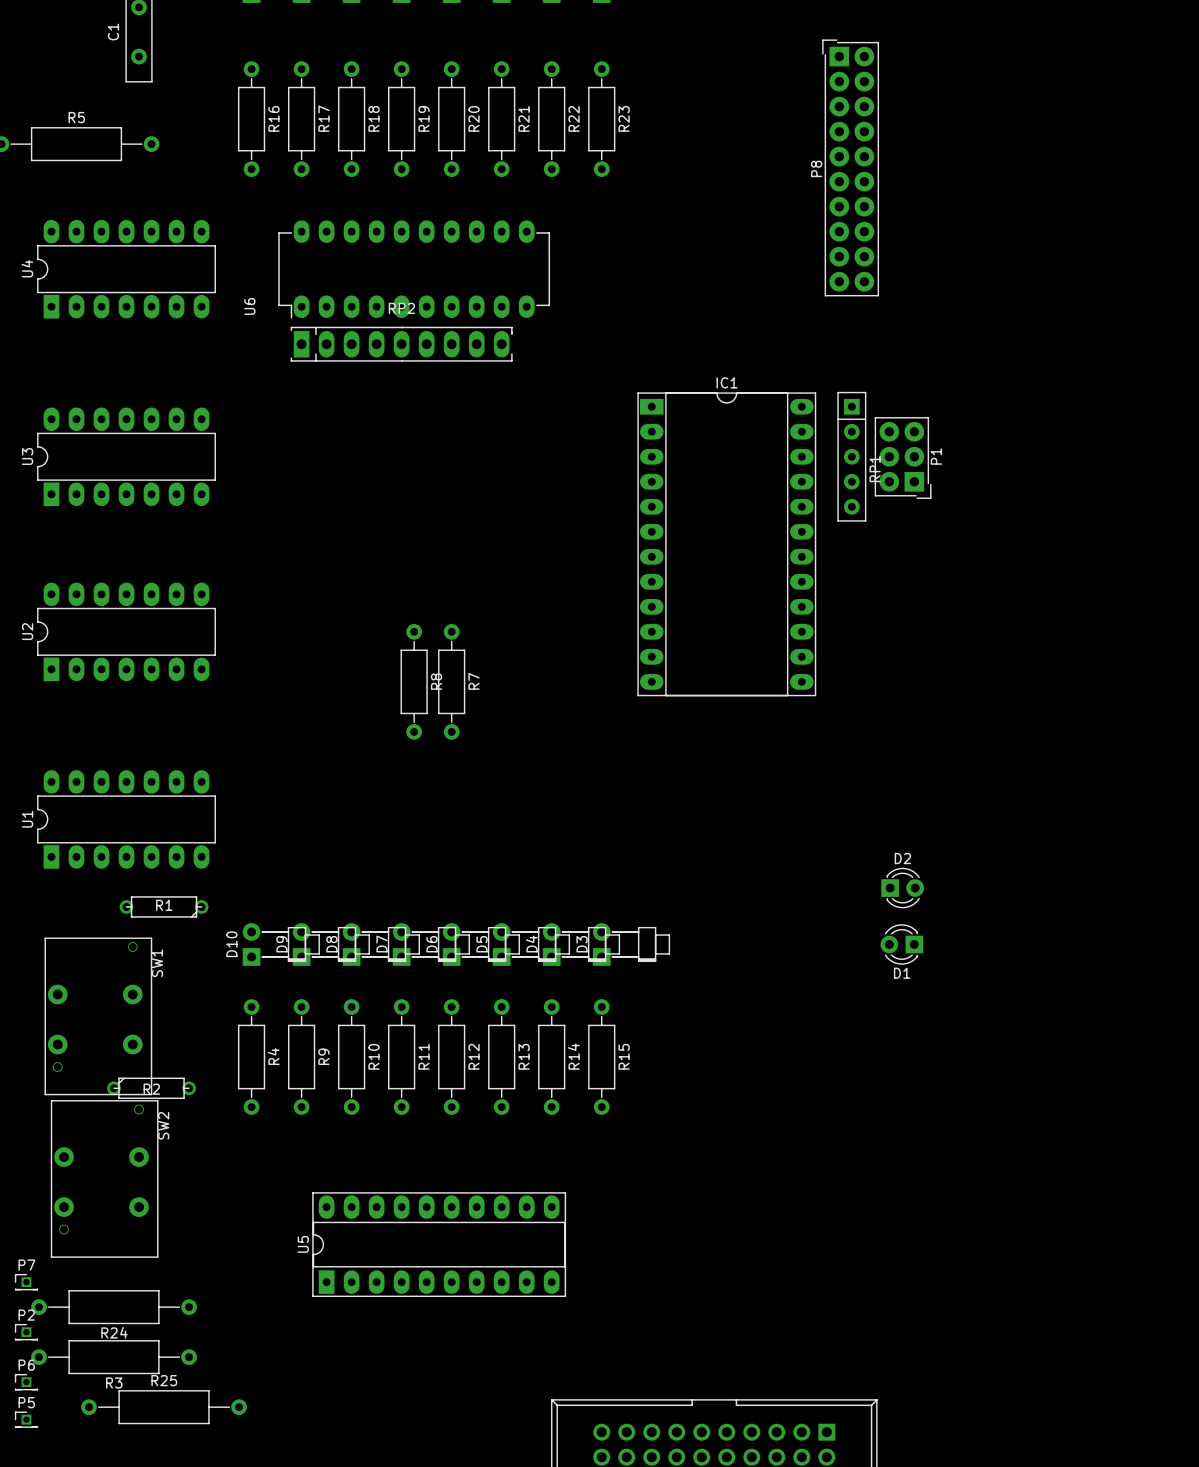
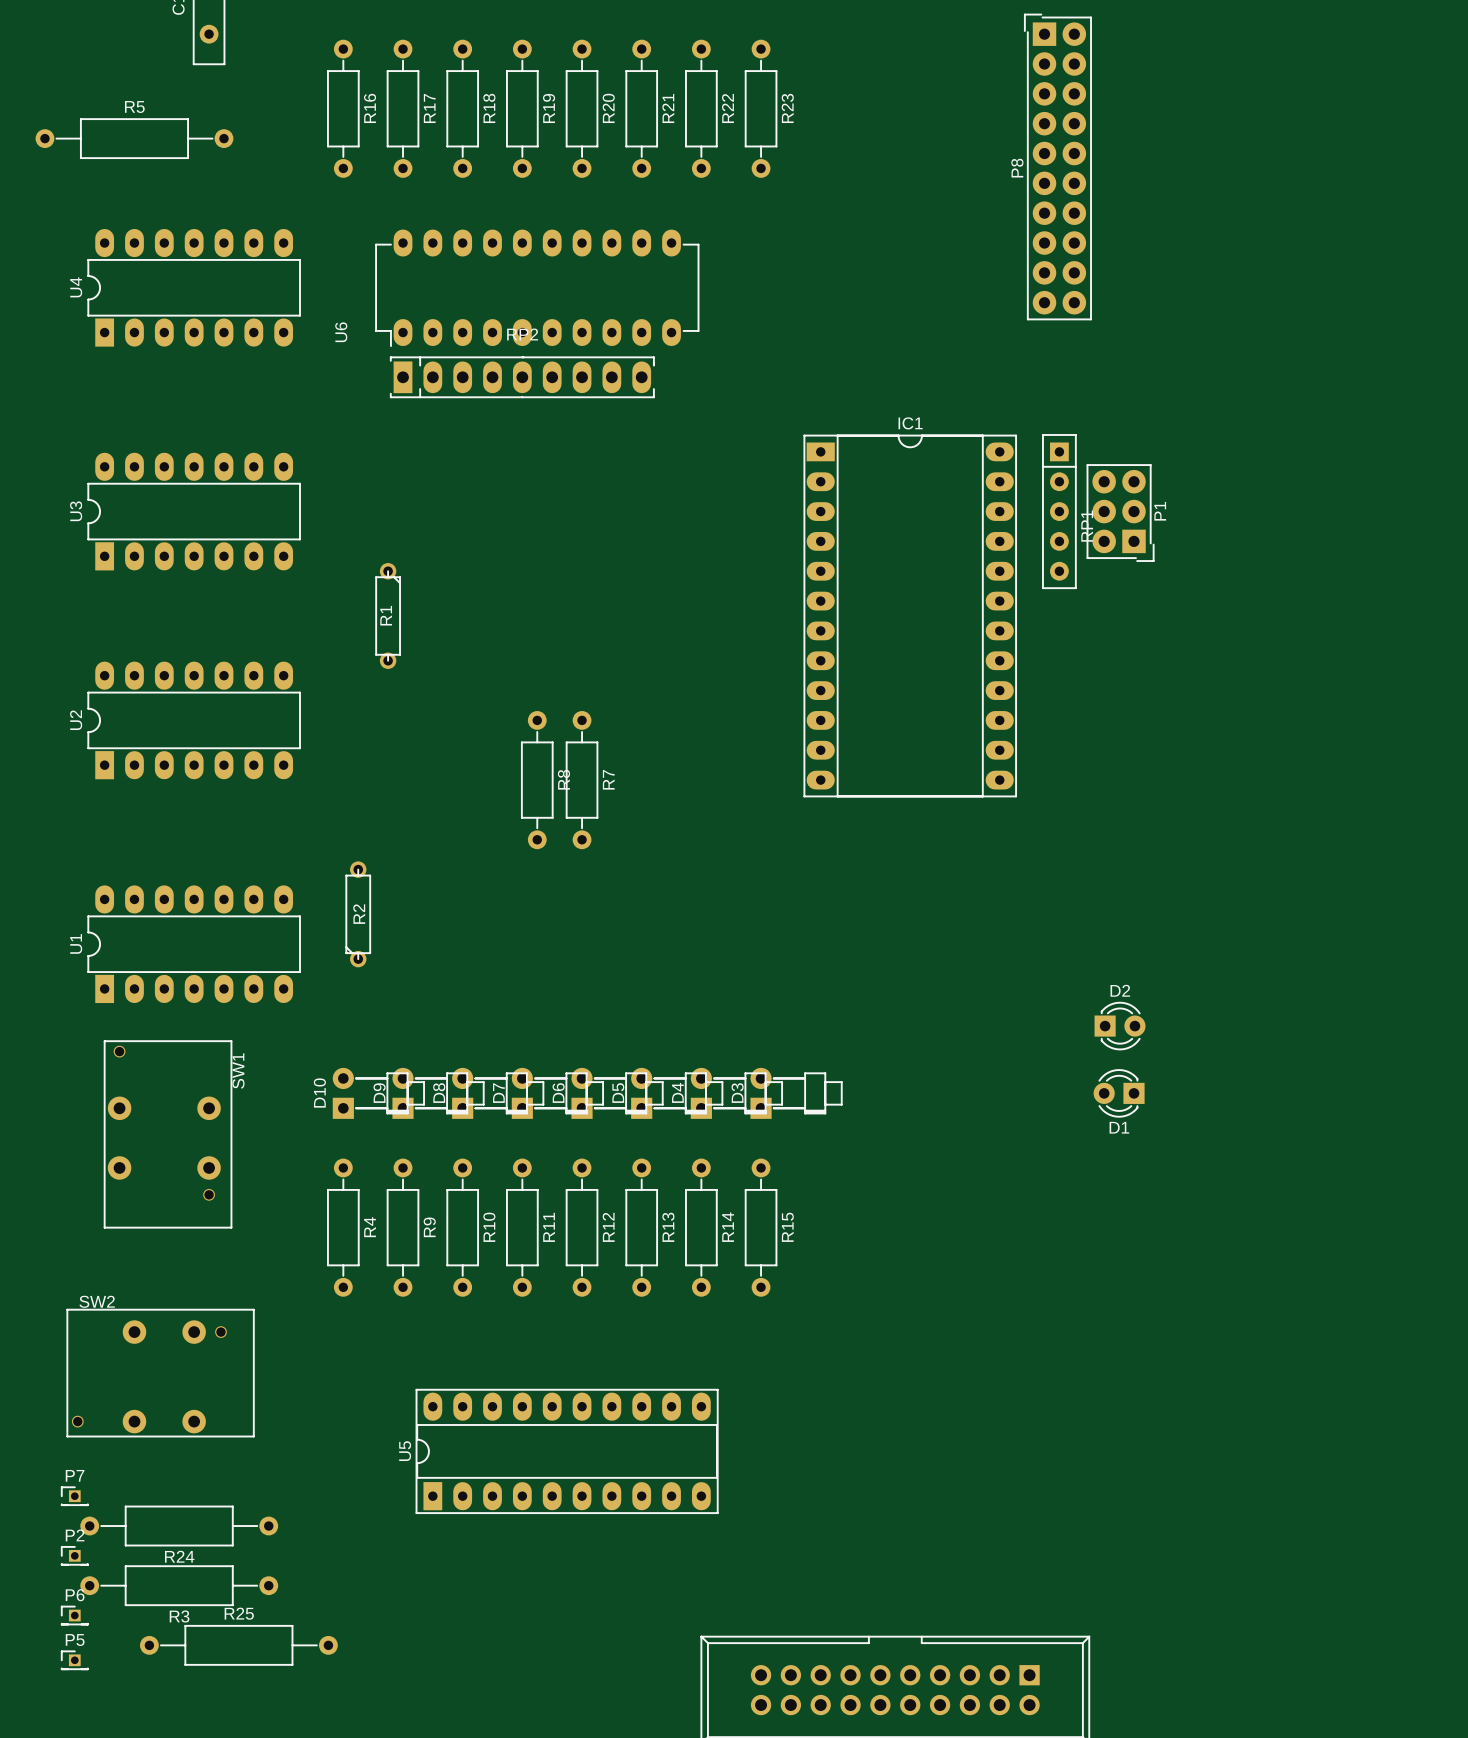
R1 rotation: 0° (164, 906) -> 90° counterclockwise (388, 615)
R1 position: (164, 906) -> (388, 615)
SW1 footprint: [44, 937, 153, 1096] -> [103, 1040, 233, 1229]
R2 rotation: 0° (151, 1088) -> 90° counterclockwise (358, 914)
R2 position: (151, 1088) -> (358, 914)
SW2 footprint: [50, 1100, 159, 1258] -> [66, 1308, 255, 1438]
SW2 name position: SW2 (163, 1125) -> SW2 (97, 1301)

